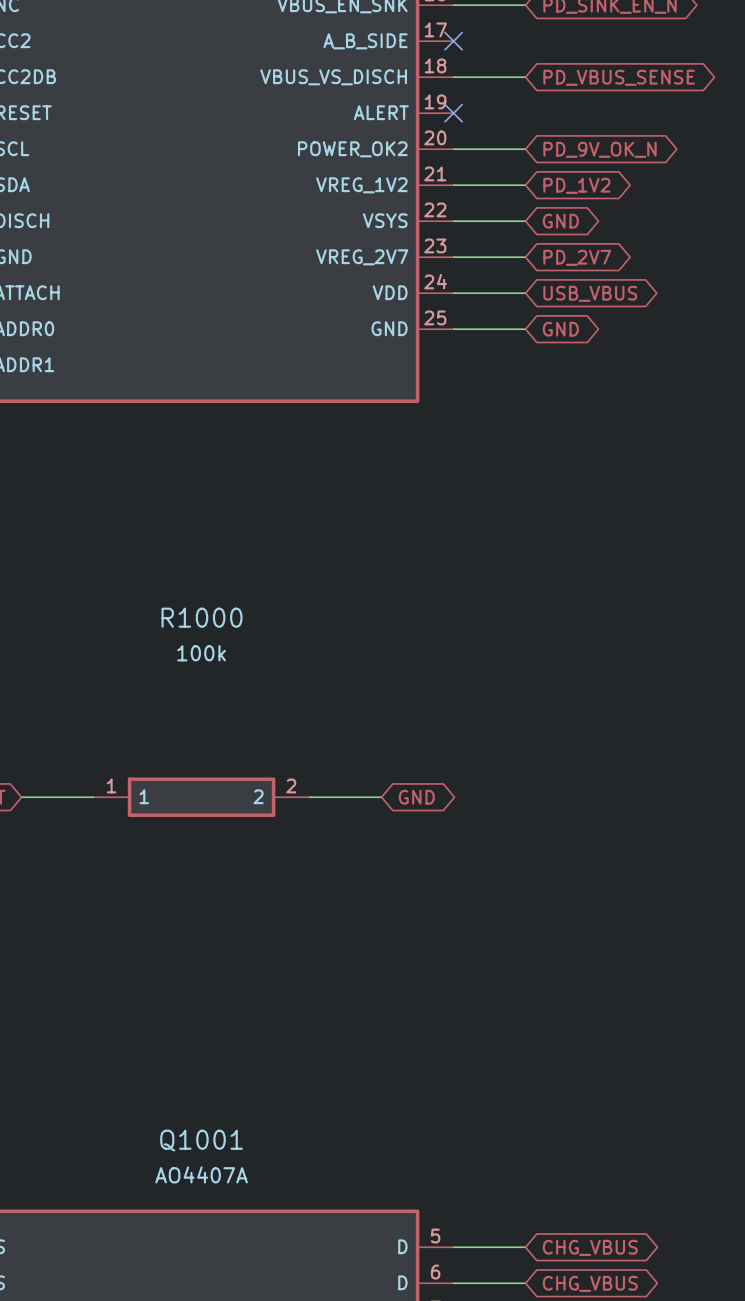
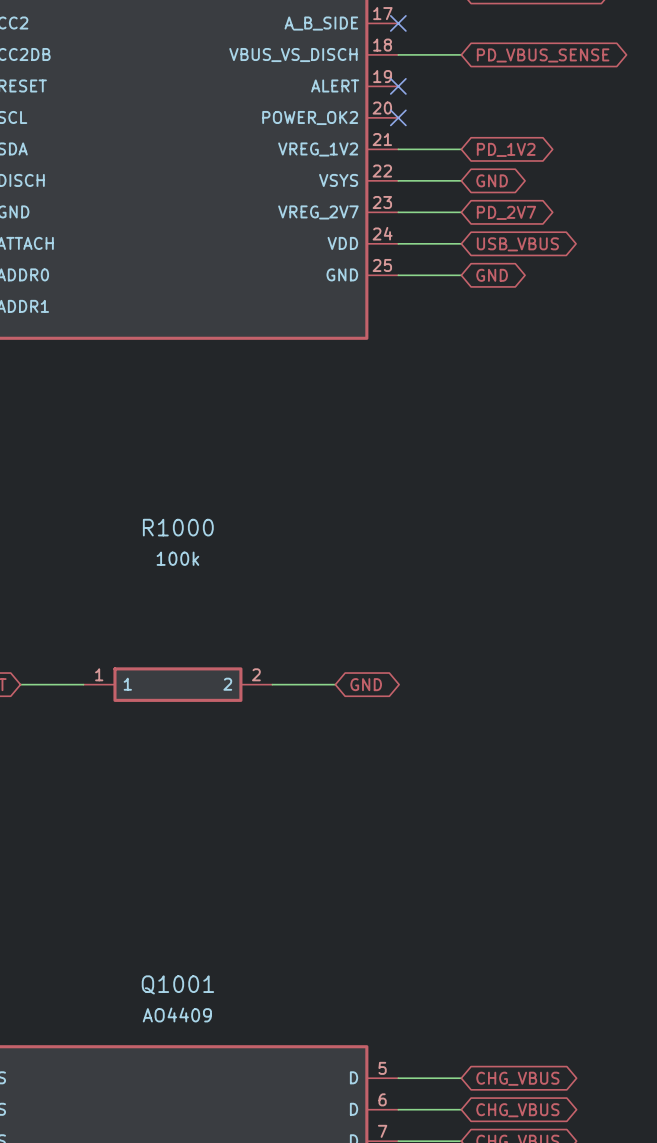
wire: (453, 149) (525, 149) -> none
no-connect mark: none -> (398, 117)
global label: PD_9V_OK_N (600, 149) -> none
Q1001 value: AO4407A (201, 1174) -> AO4409 (177, 1014)

